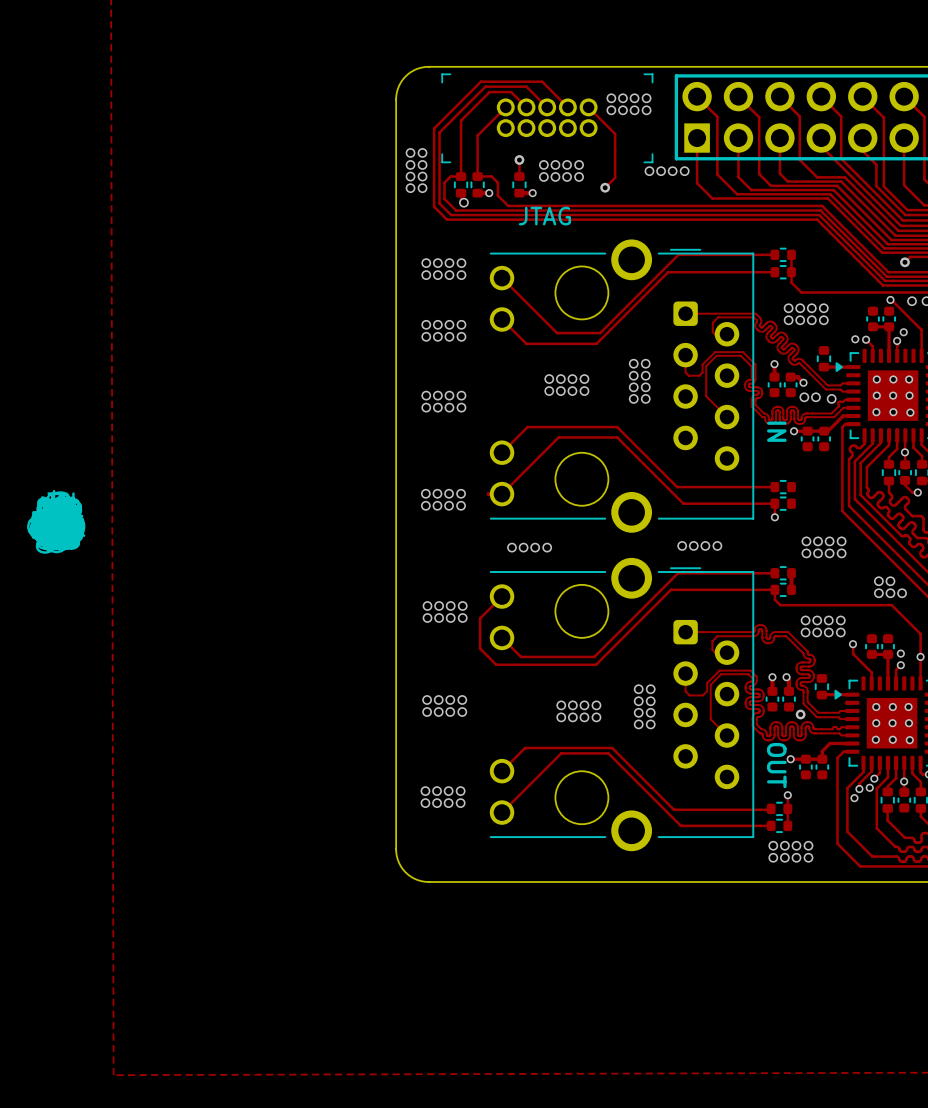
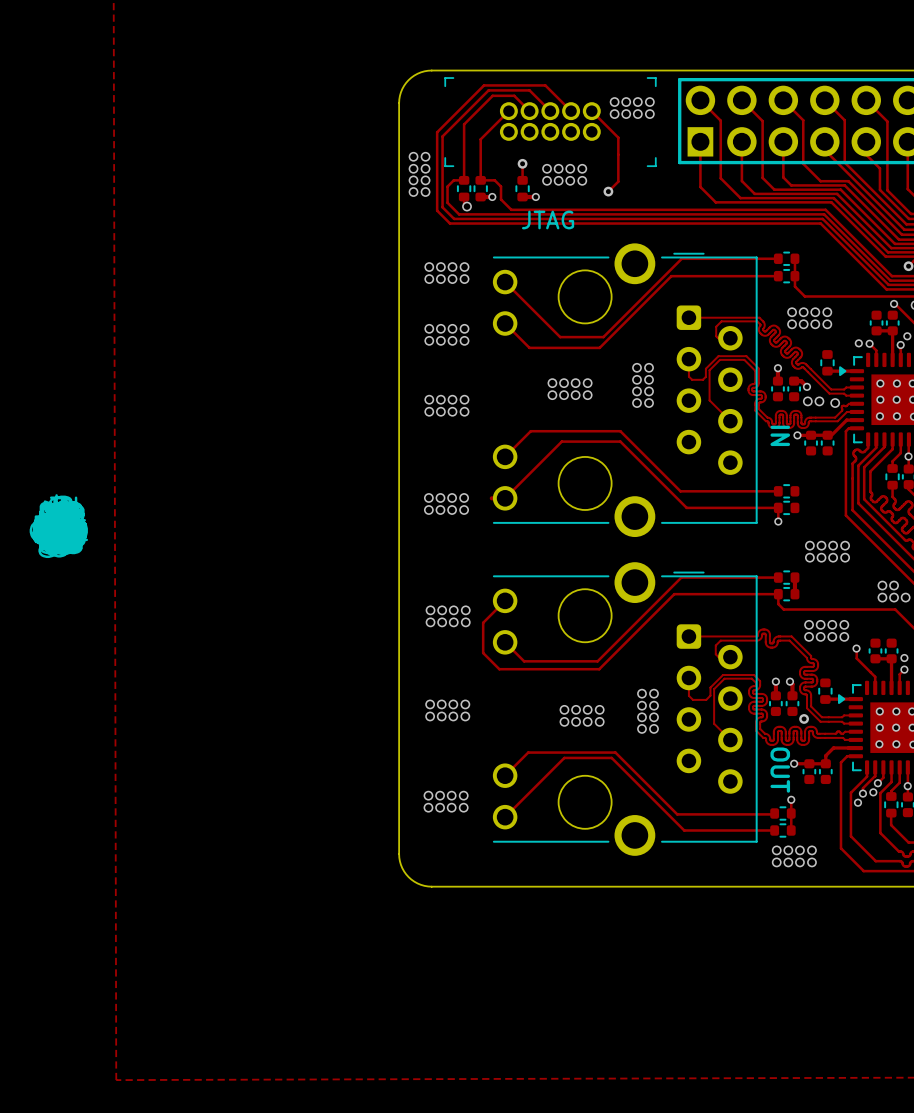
via: (649, 171) -> none
via: (661, 171) -> none
via: (672, 171) -> none
via: (684, 171) -> none
via: (682, 545) -> none
via: (693, 545) -> none
via: (705, 545) -> none
via: (717, 545) -> none
via: (511, 547) -> none
via: (523, 547) -> none
via: (535, 547) -> none
via: (547, 547) -> none

